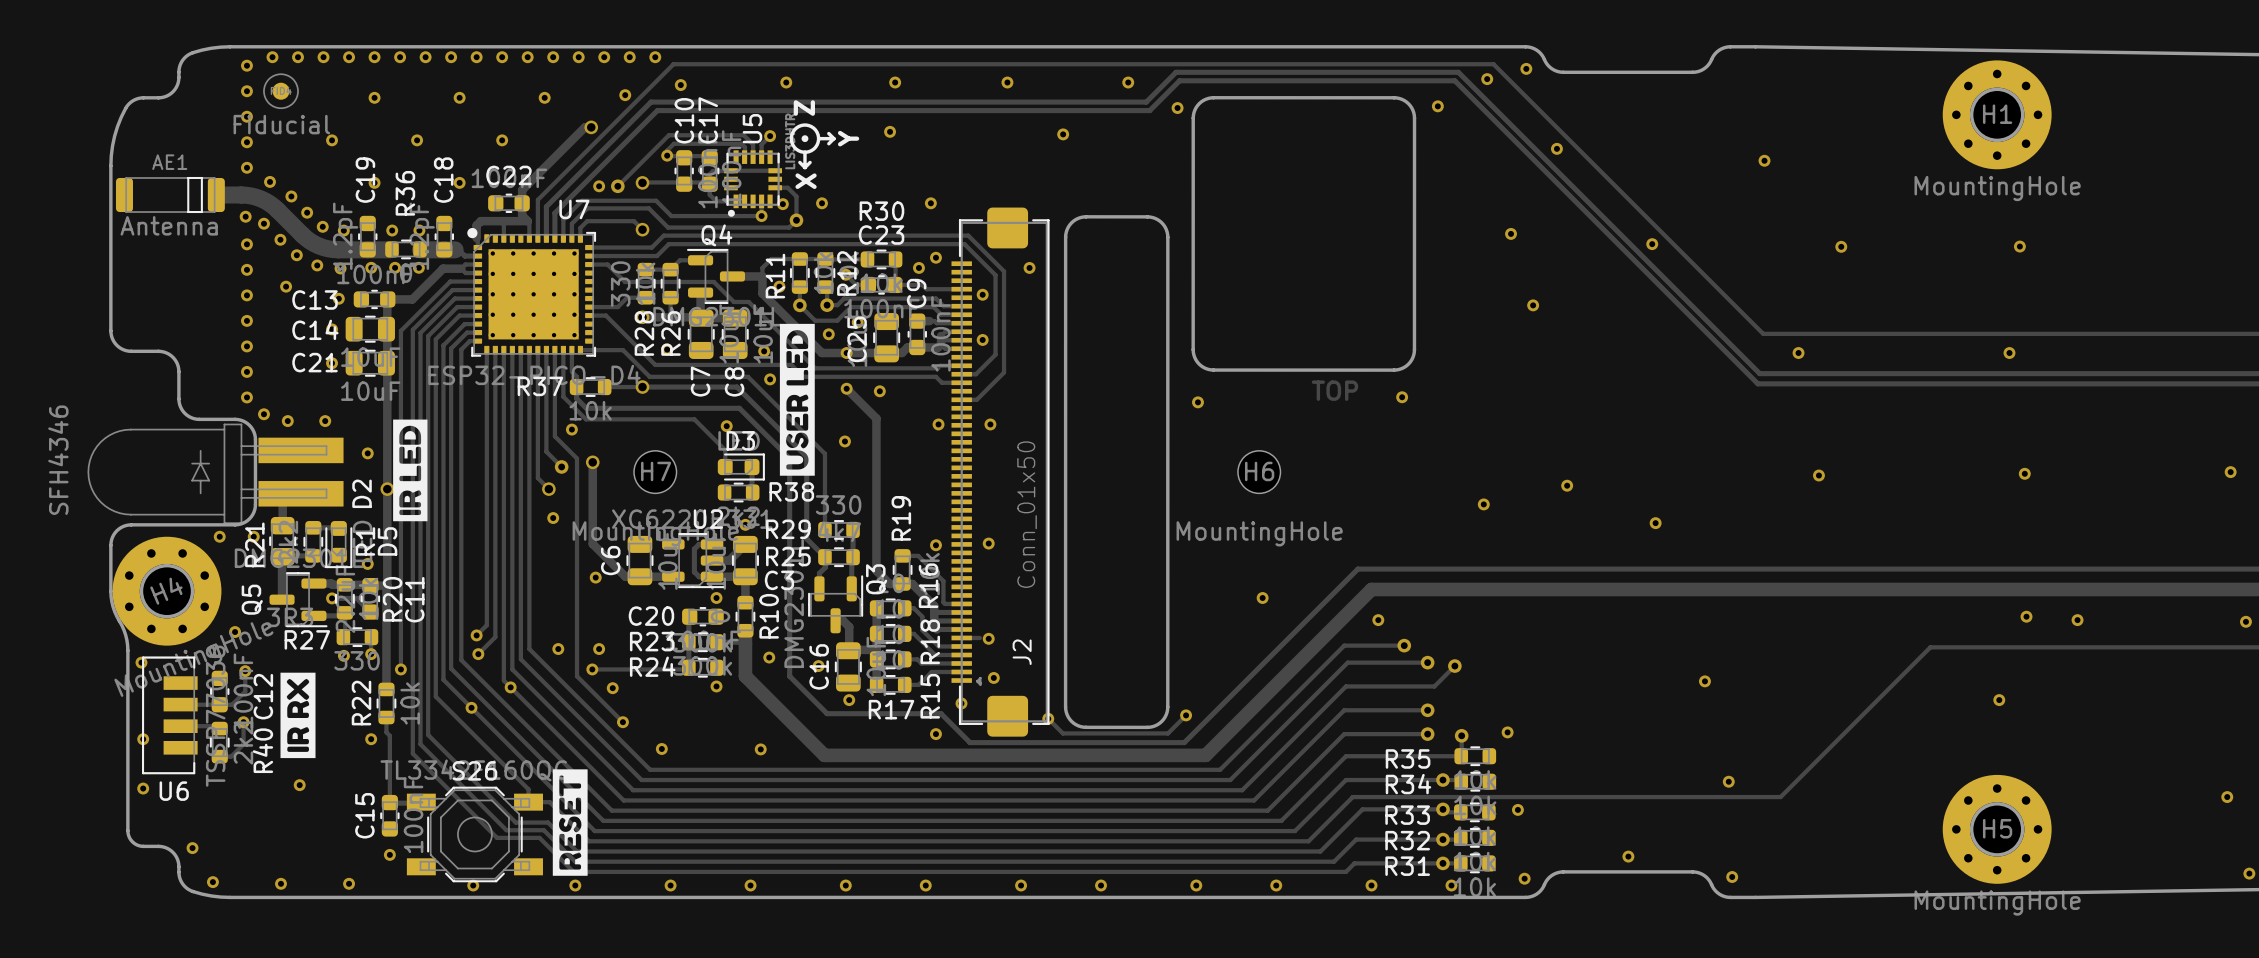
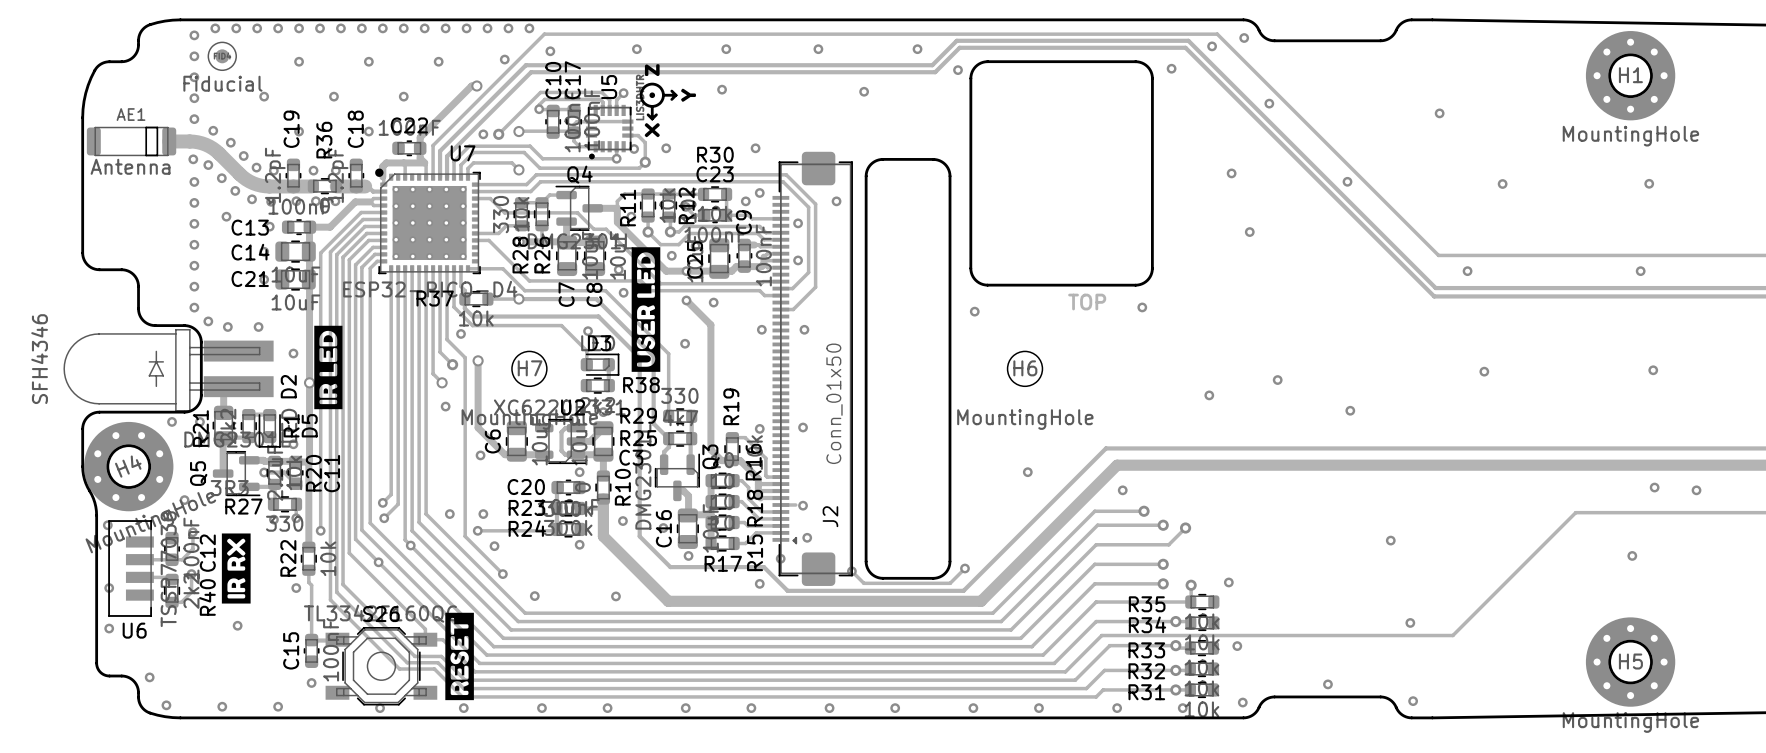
drawing: none -> [644, 64, 660, 77]
text: Z (804, 108) -> none
drawing: none -> [681, 88, 697, 102]
text: Y (848, 138) -> none
drawing: none -> [644, 123, 660, 138]
text: X (806, 181) -> none

